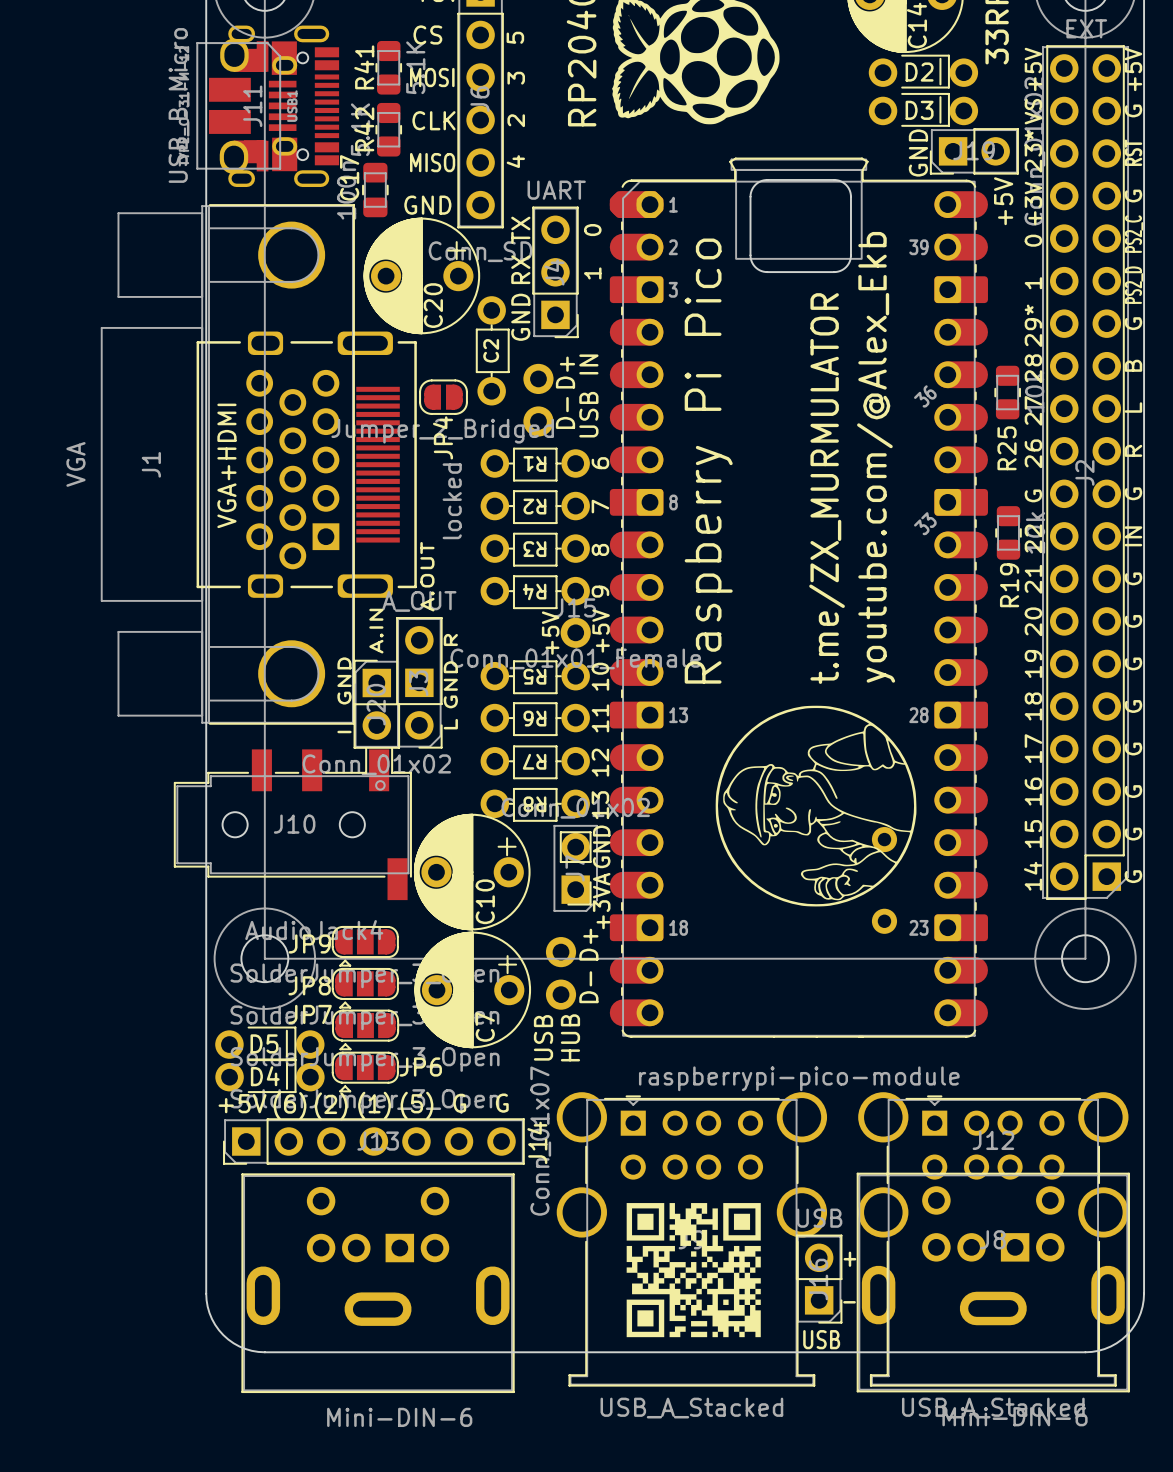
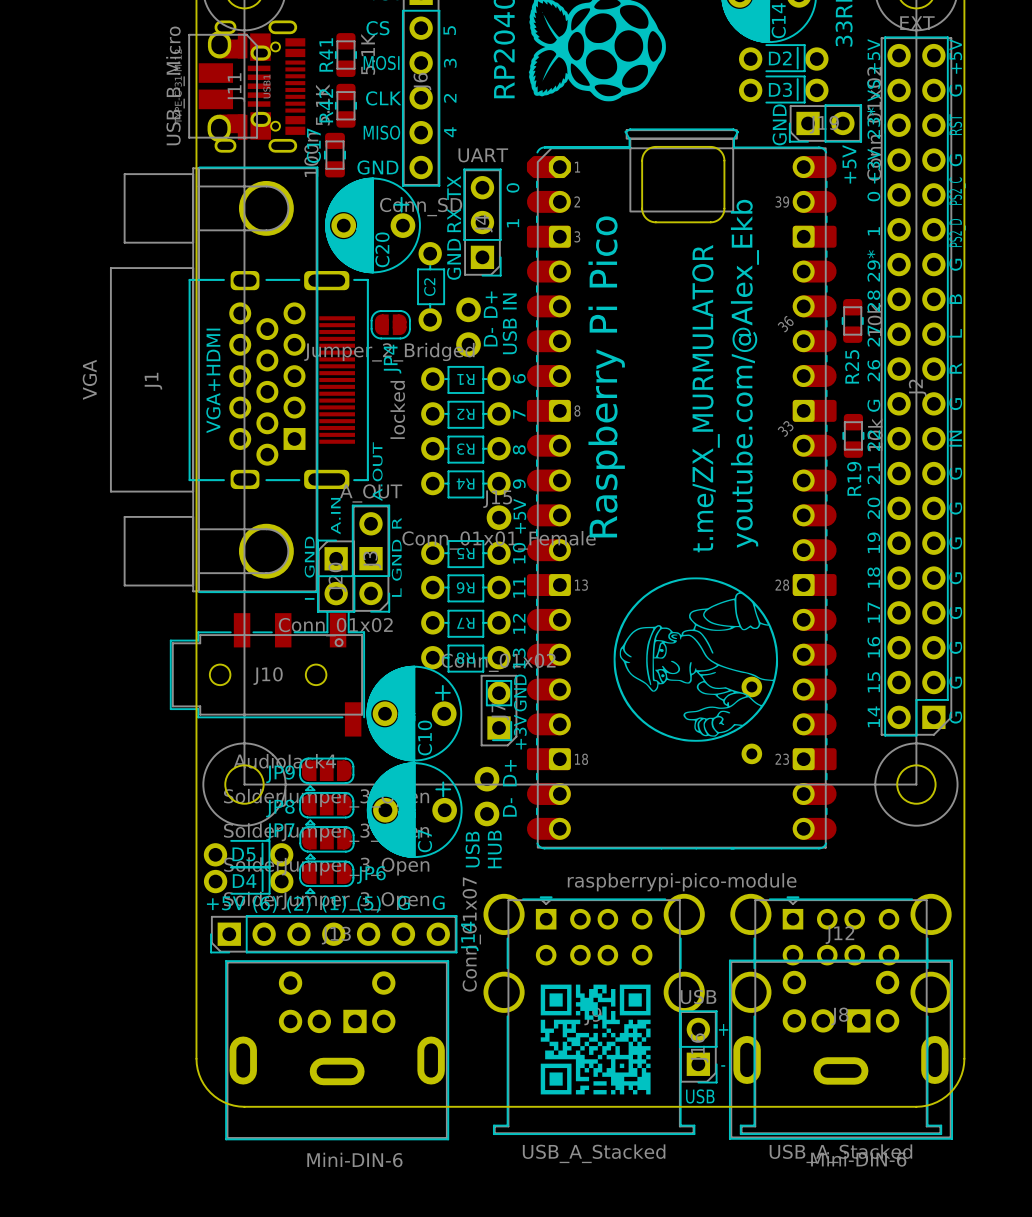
text: +5V (550, 633) -> none
text: +3VA (601, 901) -> +3V (520, 732)

